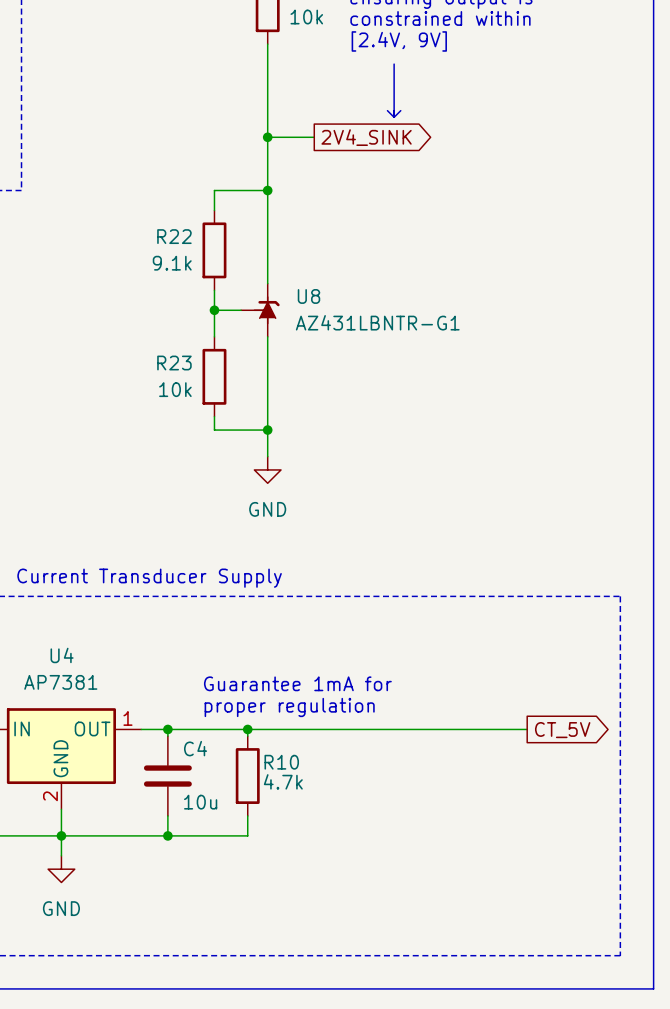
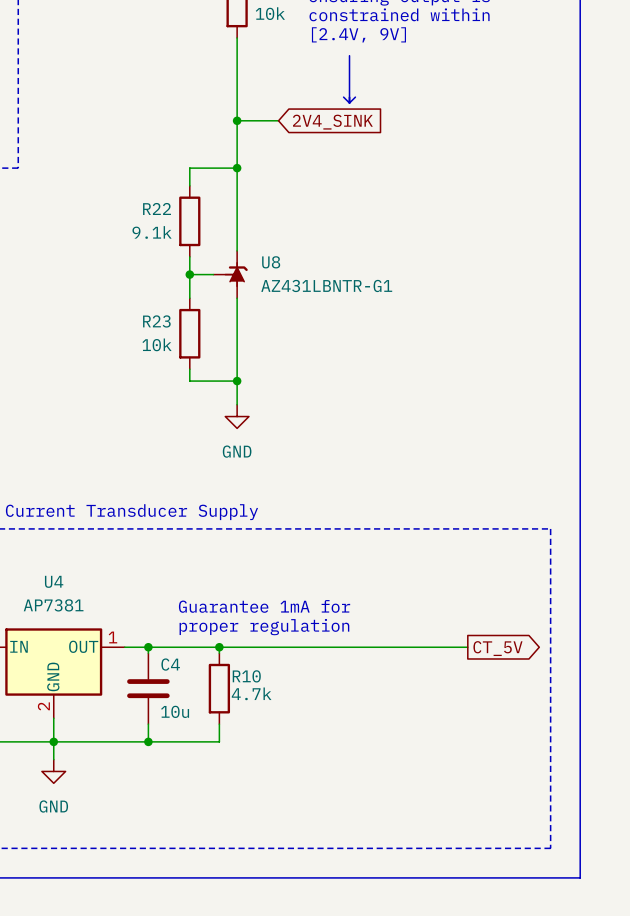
global label shape: output (366, 137) -> input (332, 122)

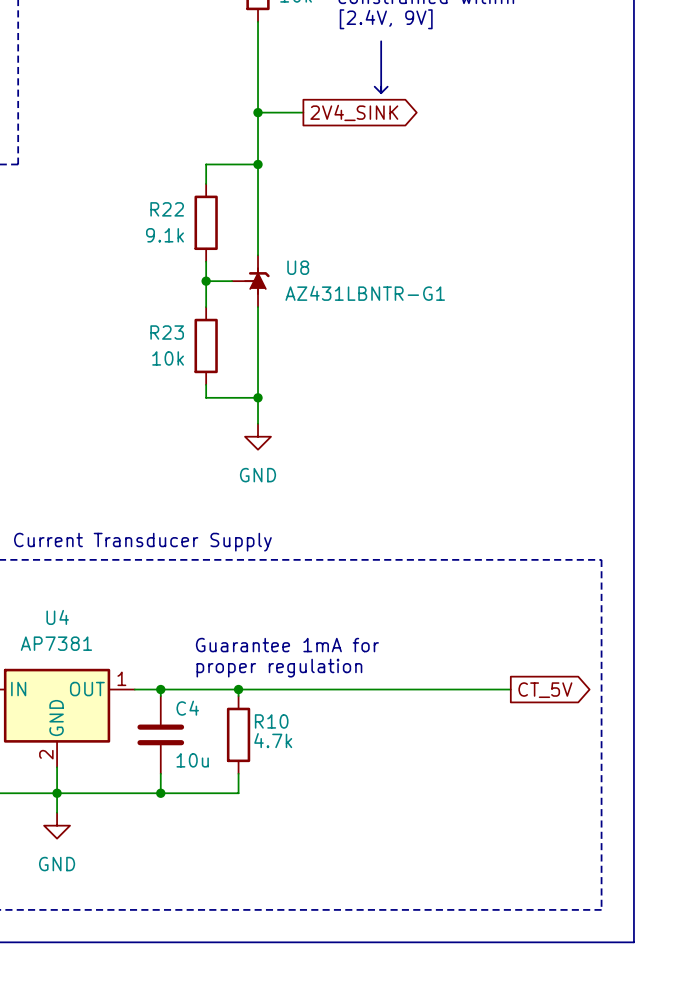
global label shape: input (332, 122) -> output (354, 112)

